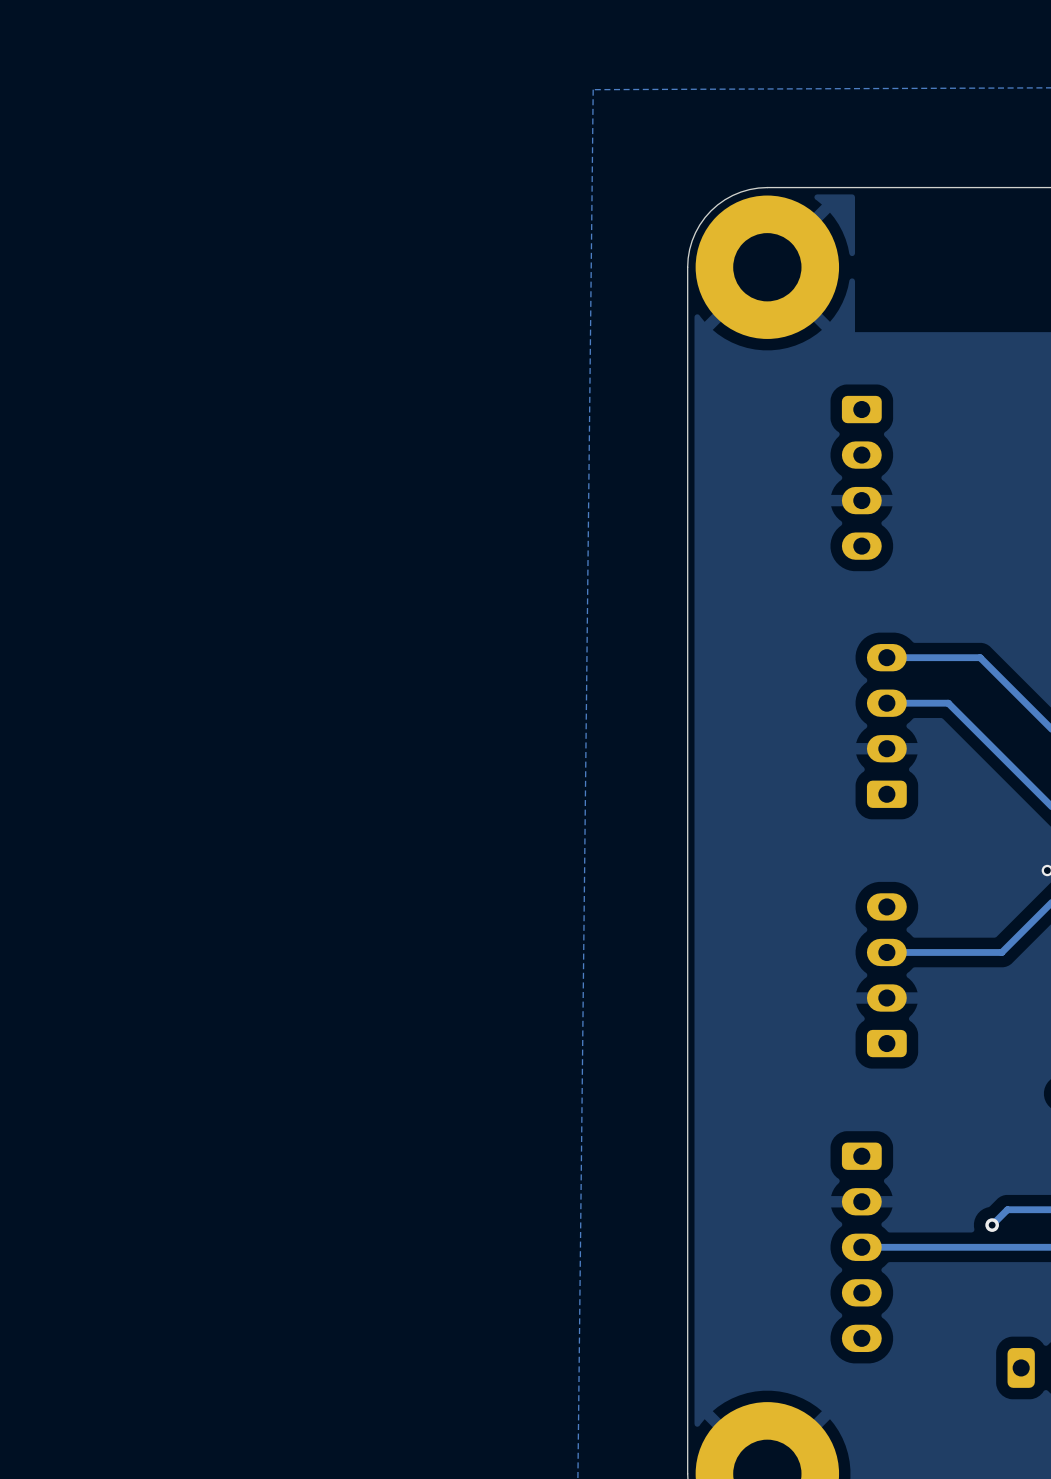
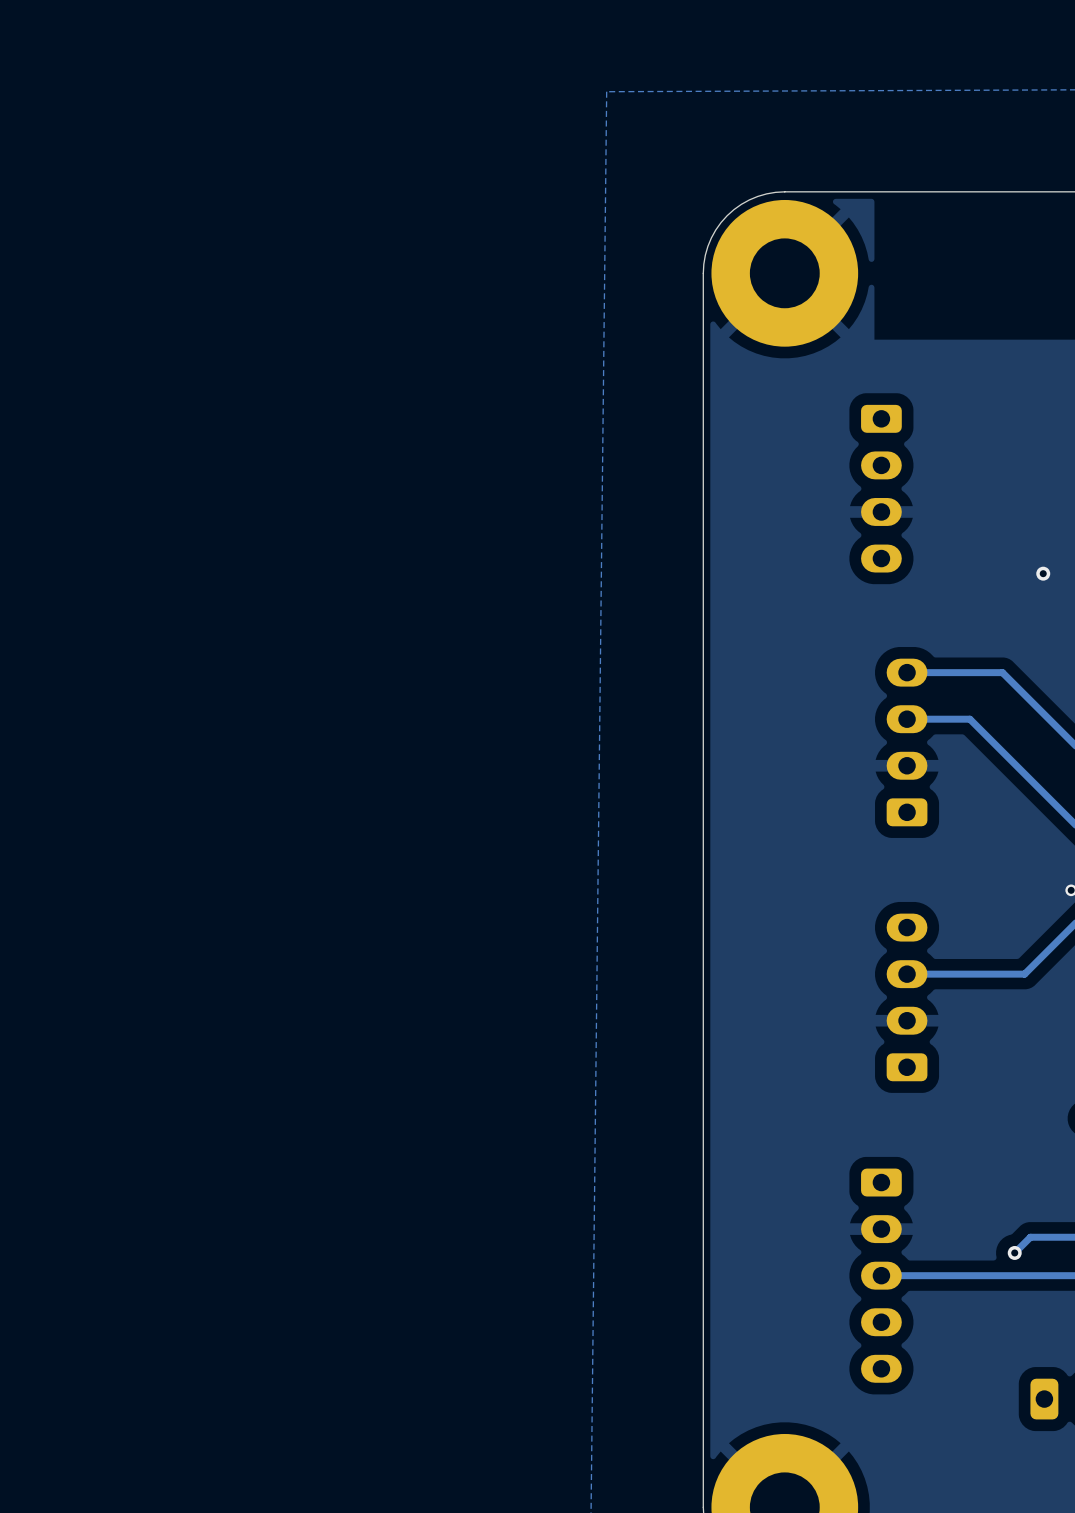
via: none -> (1043, 573)

